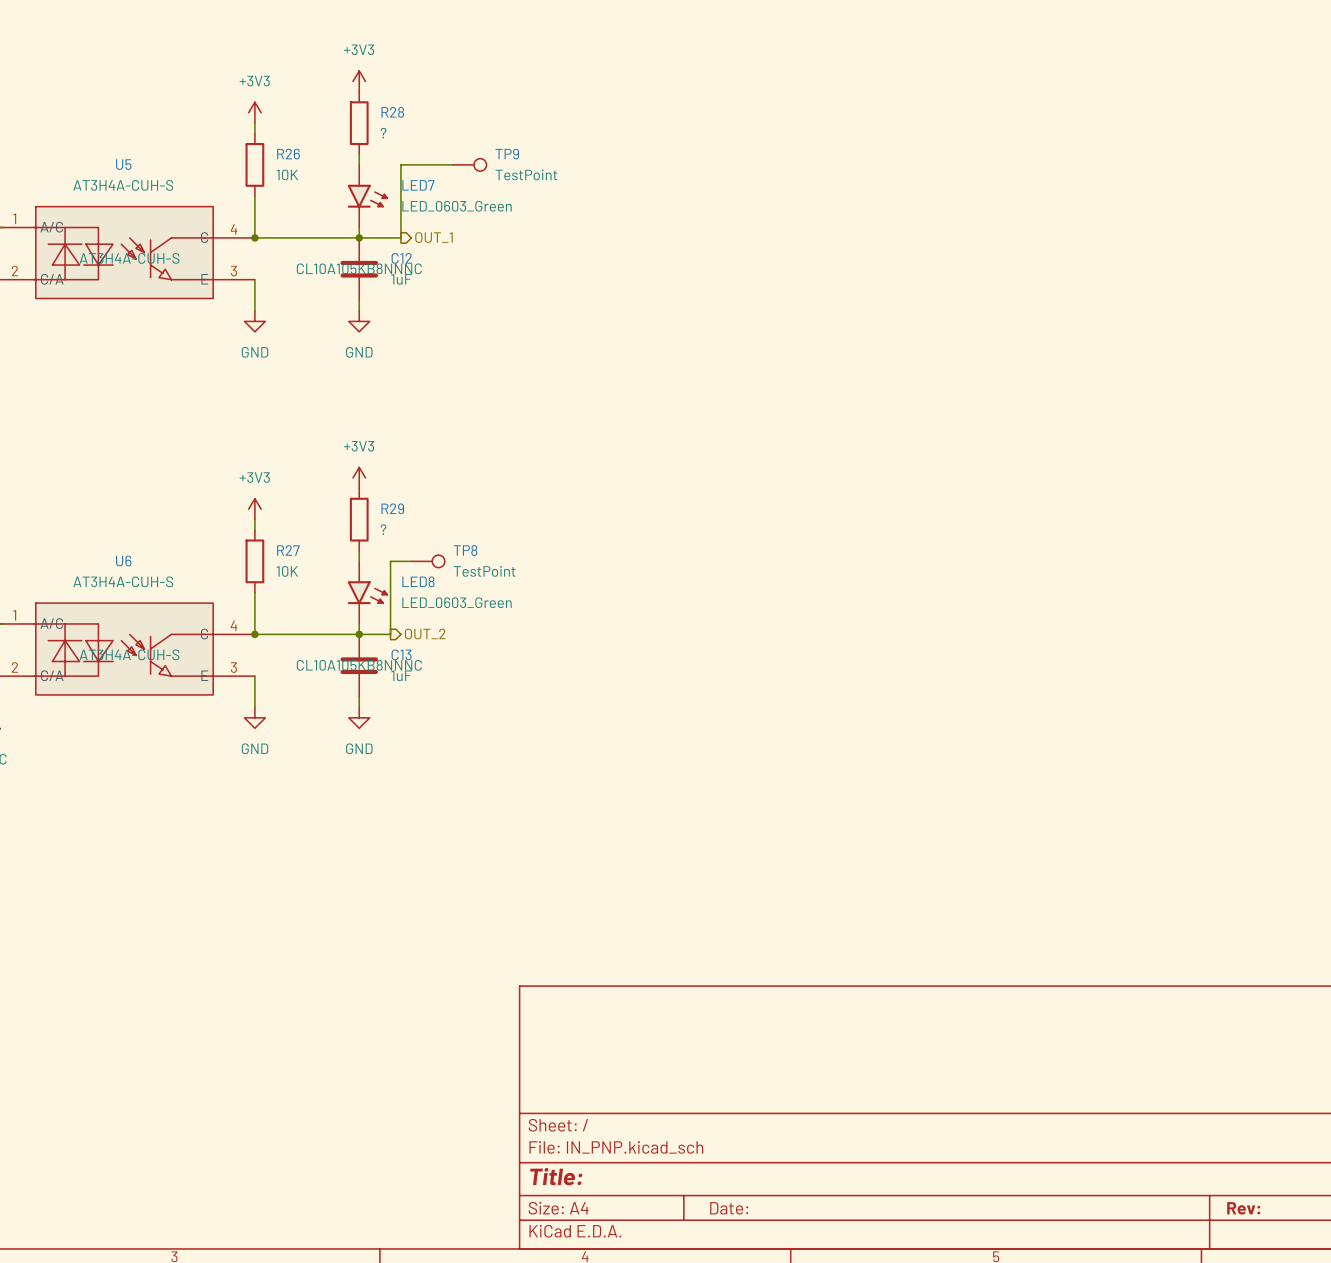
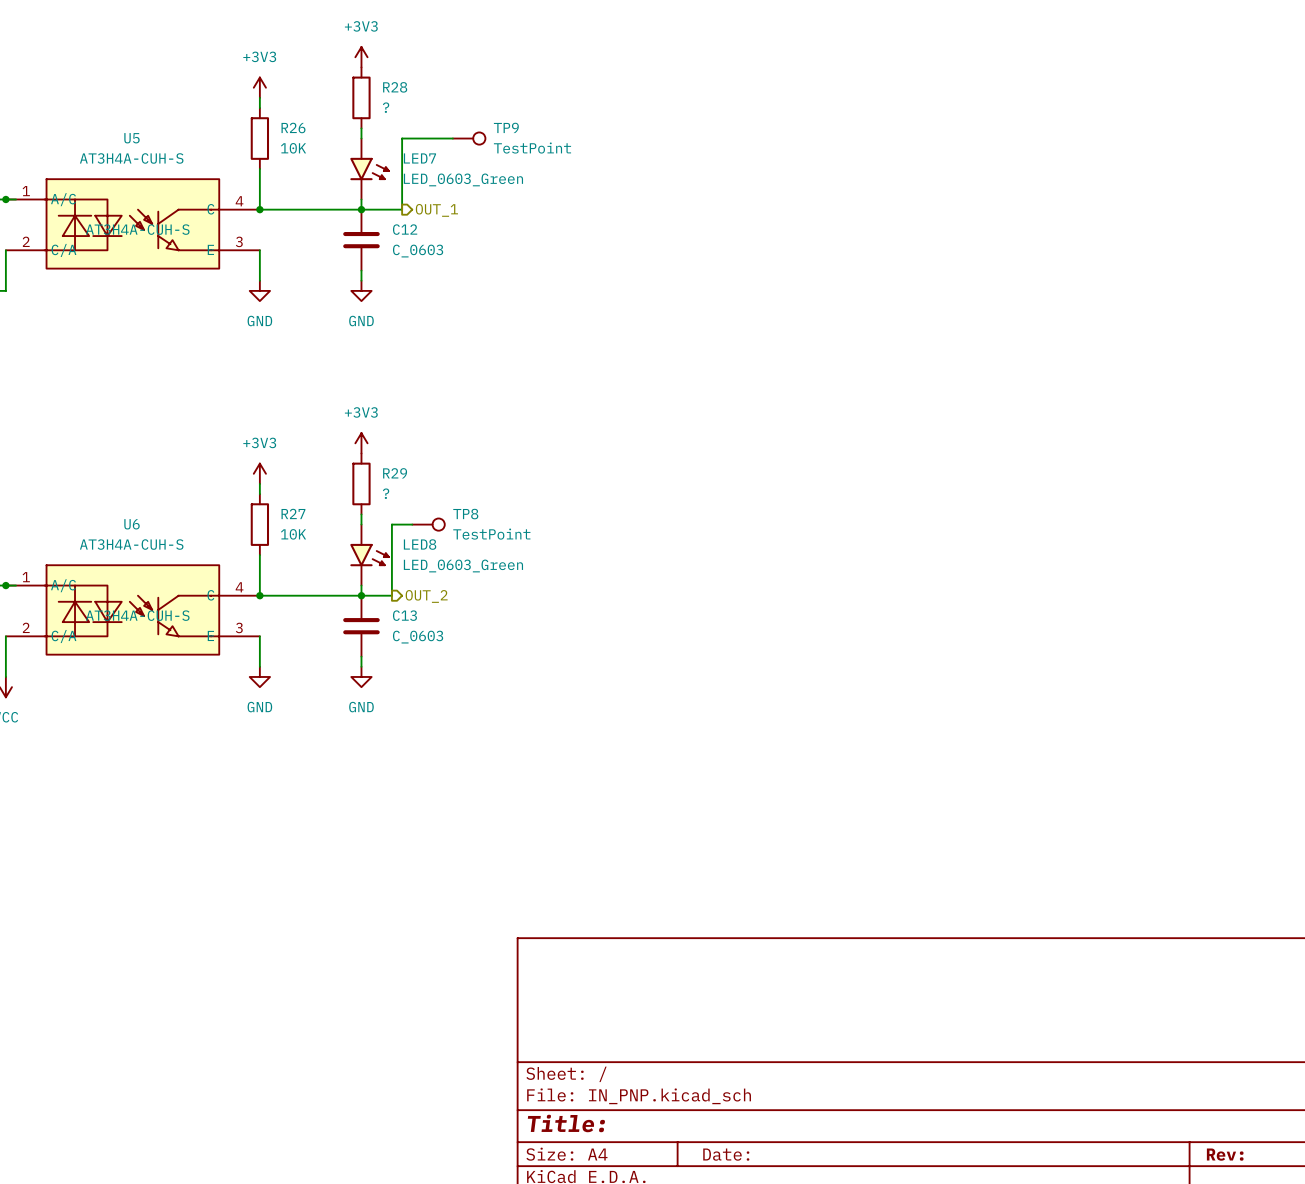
C12 text: CL10A105KB8NNNC (359, 268) -> none
C12 value: 1uF (401, 279) -> C_0603 (418, 251)
C13 text: CL10A105KB8NNNC (359, 665) -> none
C13 value: 1uF (401, 675) -> C_0603 (418, 637)

